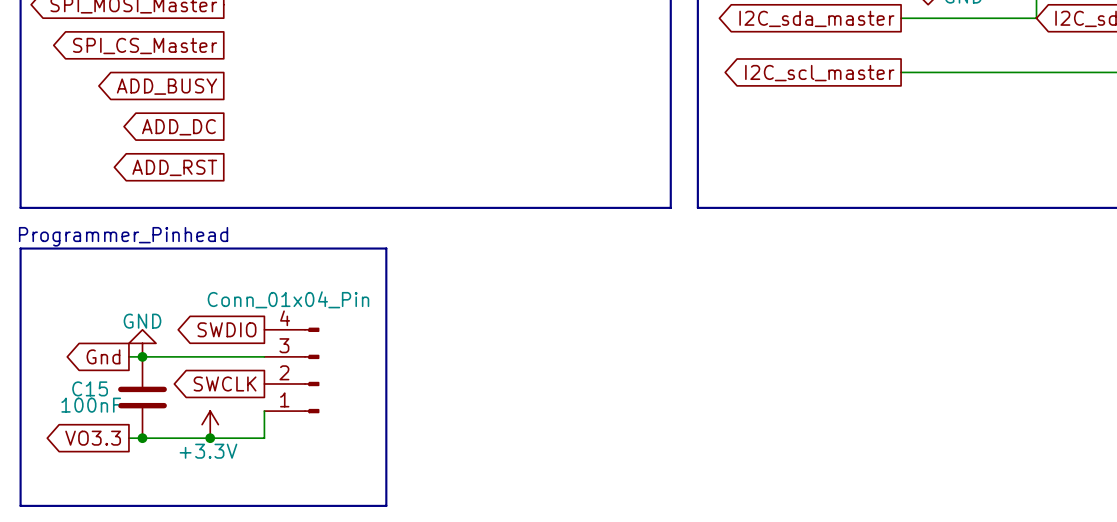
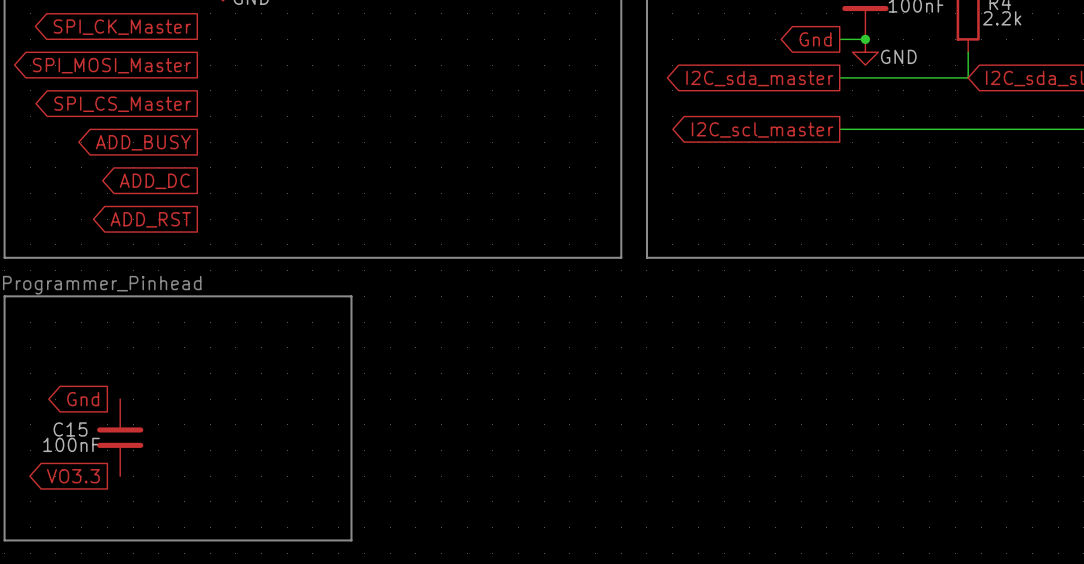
global label: SWDIO (226, 329) -> none
power symbol: GND (142, 343) -> none
wire: (128, 356) (264, 356) -> none
junction: (142, 356) -> none
part: Conn_01x04_Pin (291, 370) -> none
global label: SWCLK (225, 383) -> none
wire: (264, 411) (264, 438) (128, 438) -> none
power symbol: +3.3V (210, 424) -> none
junction: (142, 438) -> none
junction: (210, 438) -> none

